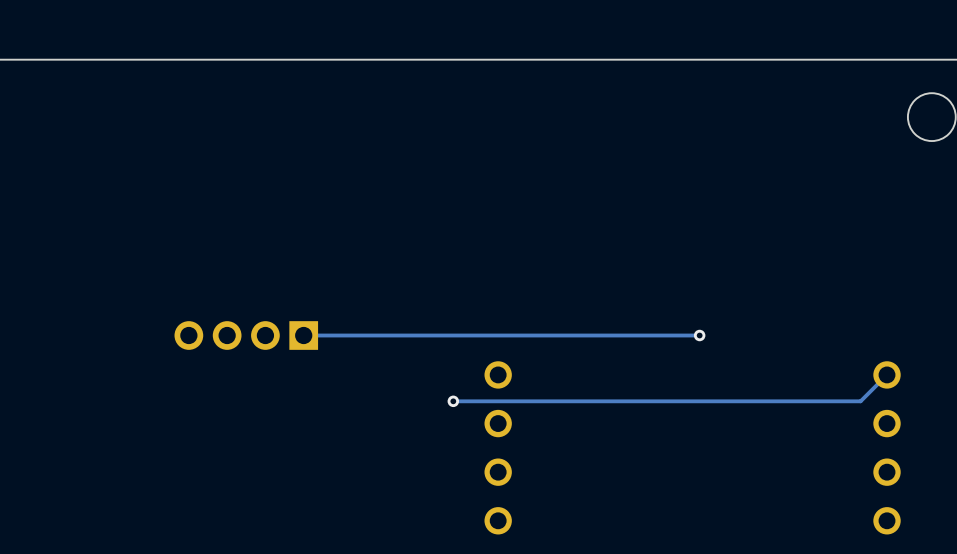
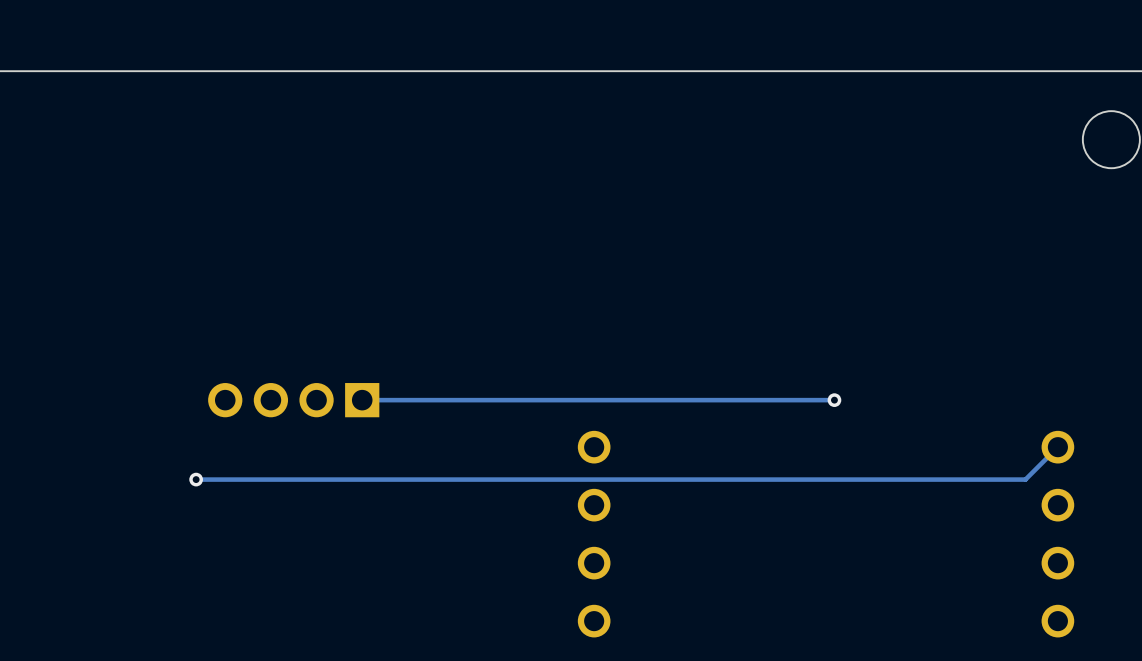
via: (453, 401) -> none
track: (860, 401) (453, 401) -> (1026, 478) (196, 479)
via: none -> (196, 479)

